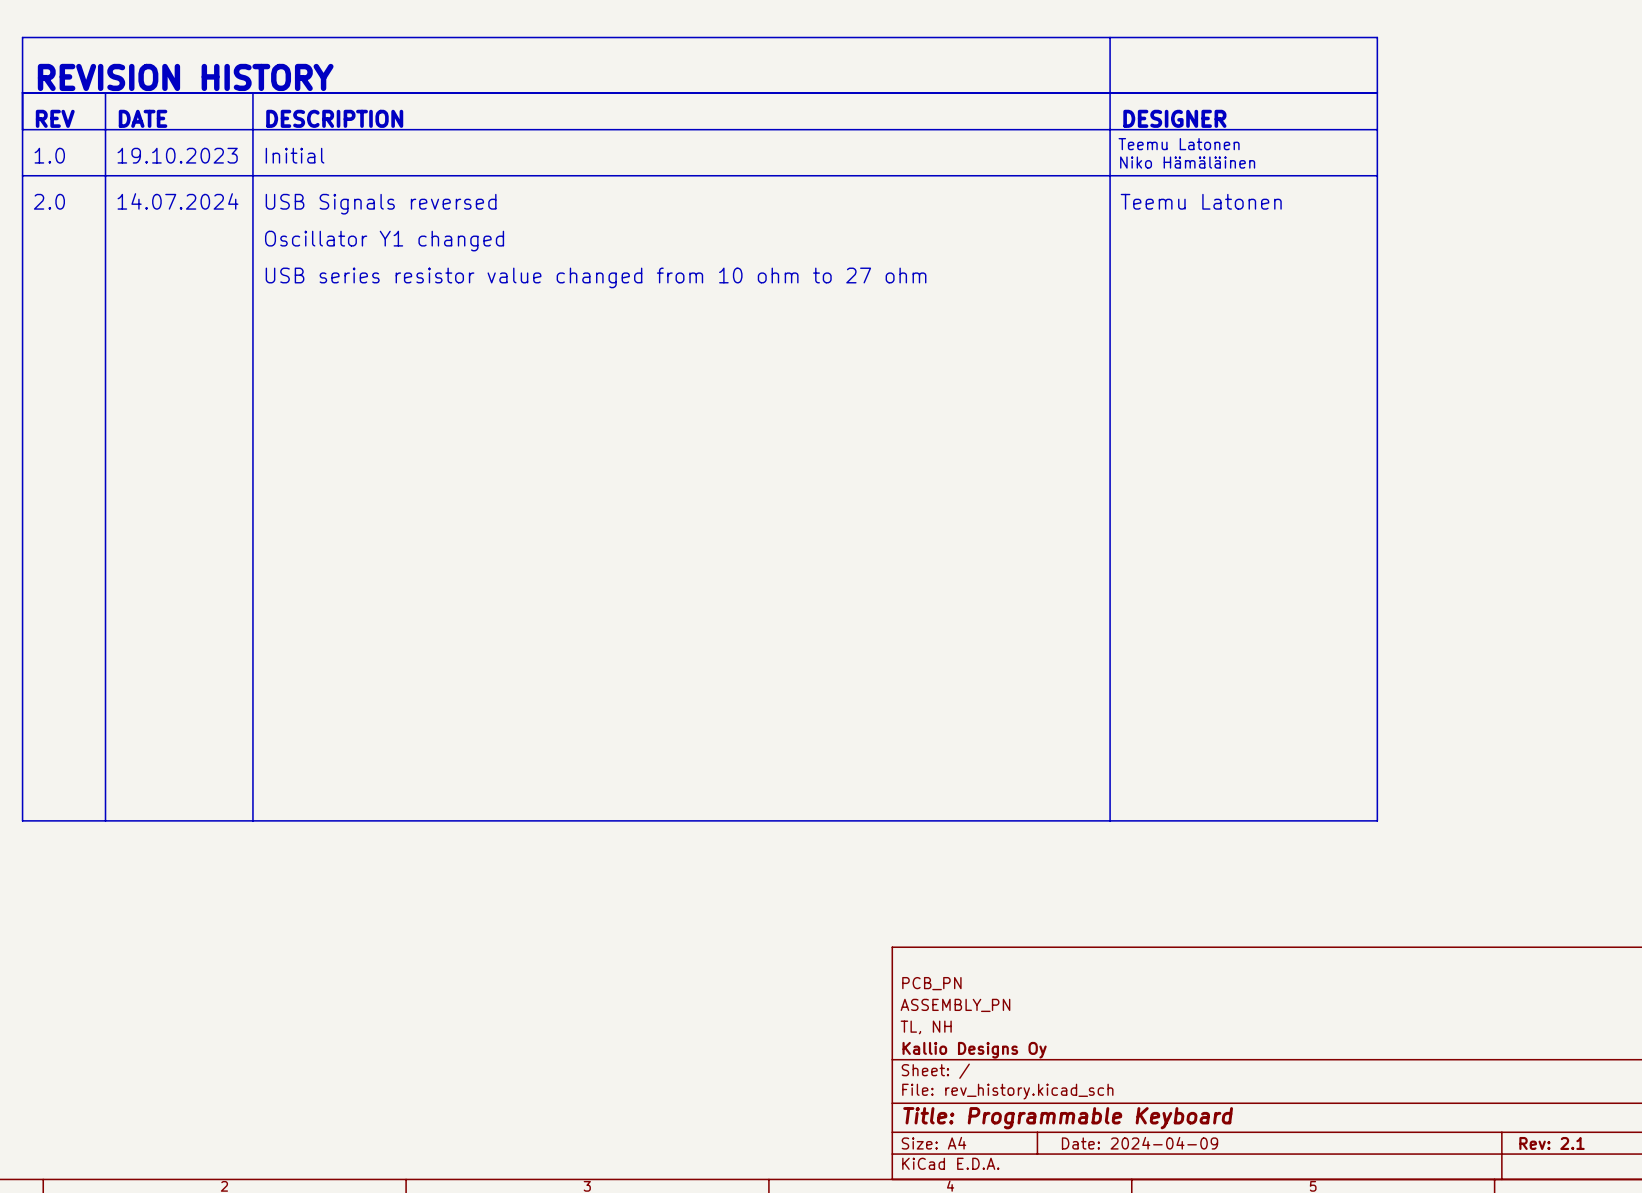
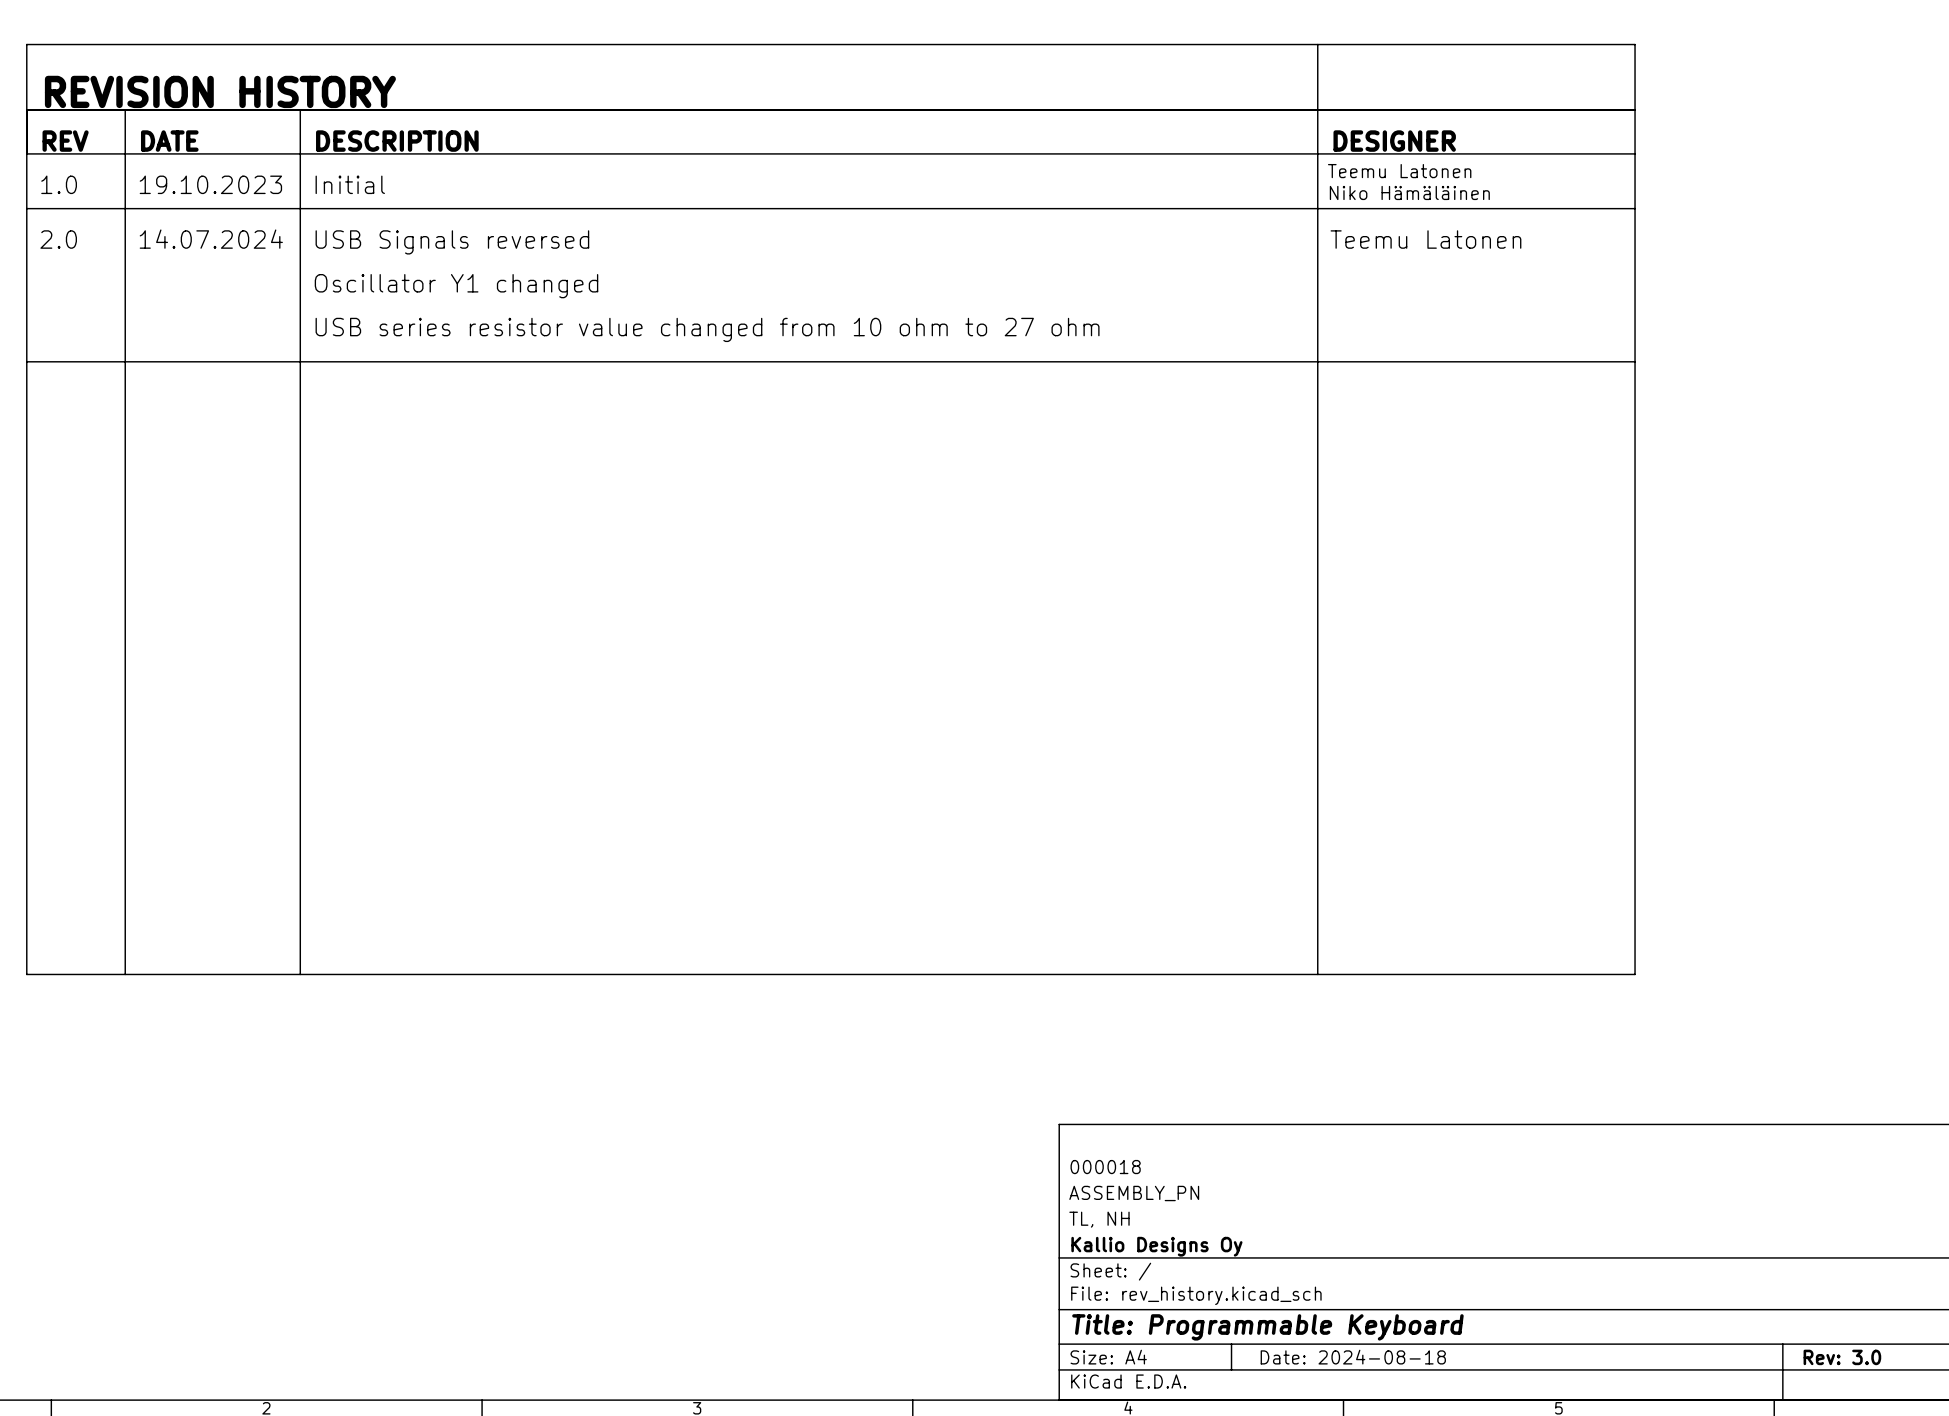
line: none -> (26, 361) (1635, 361)
title block: PCB_PN (931, 983) -> 000018 (1105, 1167)
title block: Date: 2024-04-09 (1140, 1143) -> Date: 2024-08-18 (1353, 1357)
title block: Rev: 2.1 (1552, 1143) -> Rev: 3.0 (1842, 1357)

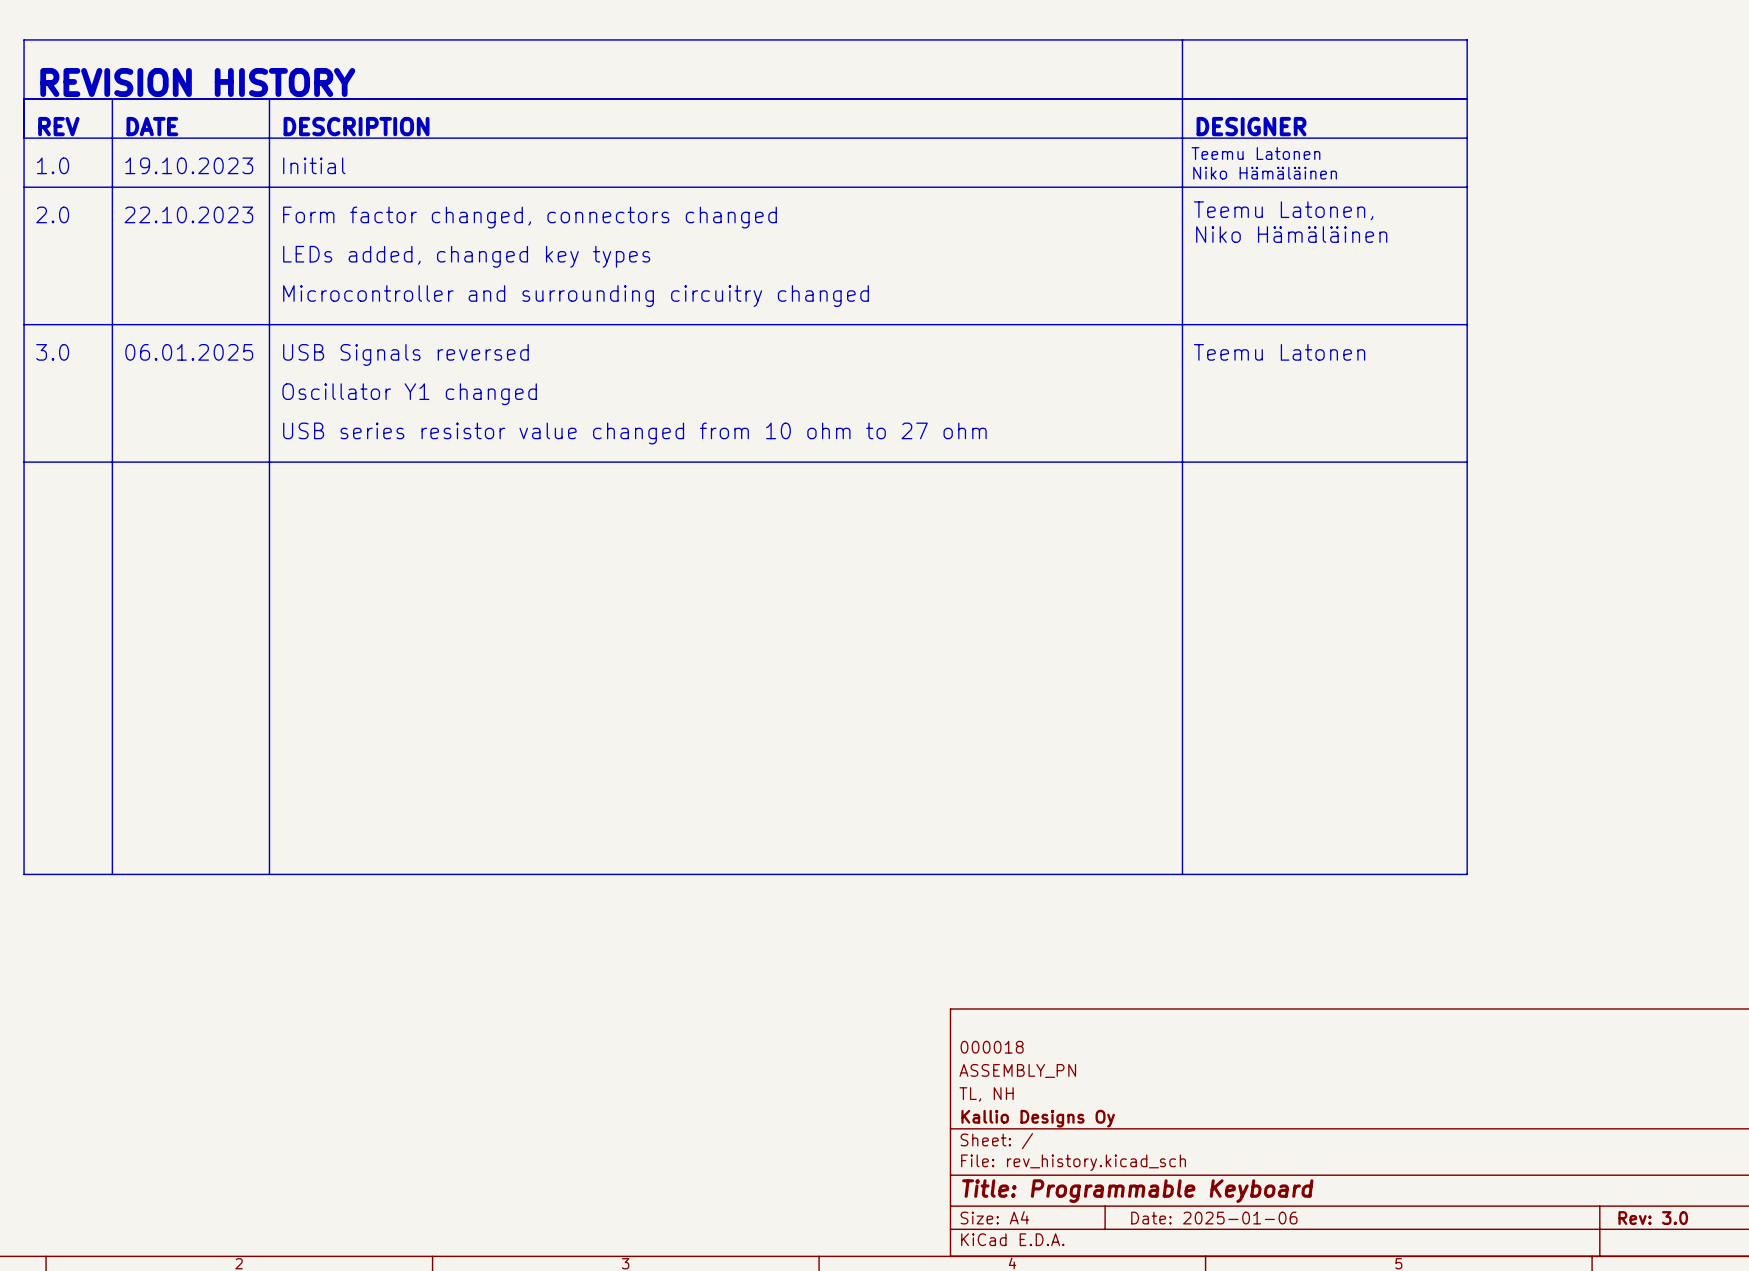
text: none -> Teemu Latonen, (1283, 210)
text: 14.07.2024 (211, 239) -> 22.10.2023 (188, 214)
text position: Teemu Latonen (1425, 239) -> Teemu Latonen (1279, 352)
text: USB Signals reversed (452, 242) -> Form factor changed, connectors changed (529, 217)
text: none -> Niko Hämäläinen (1291, 234)
text: Oscillator Y1 changed (456, 286) -> LEDs added, changed key types (466, 256)
text: USB series resistor value changed from 10 ohm to 27 ohm (707, 329) -> Microcontroller and surrounding circuitry changed (576, 296)
text: none -> 3.0 (52, 352)
text: none -> 06.01.2025 (189, 352)
text: none -> USB Signals reversed (405, 354)
text: none -> Oscillator Y1 changed (409, 394)
text: none -> USB series resistor value changed from 10 ohm to 27 ohm (634, 433)
line: none -> (24, 462) (1467, 462)
title block: Date: 2024-08-18 (1353, 1357) -> Date: 2025-01-06 (1214, 1218)

